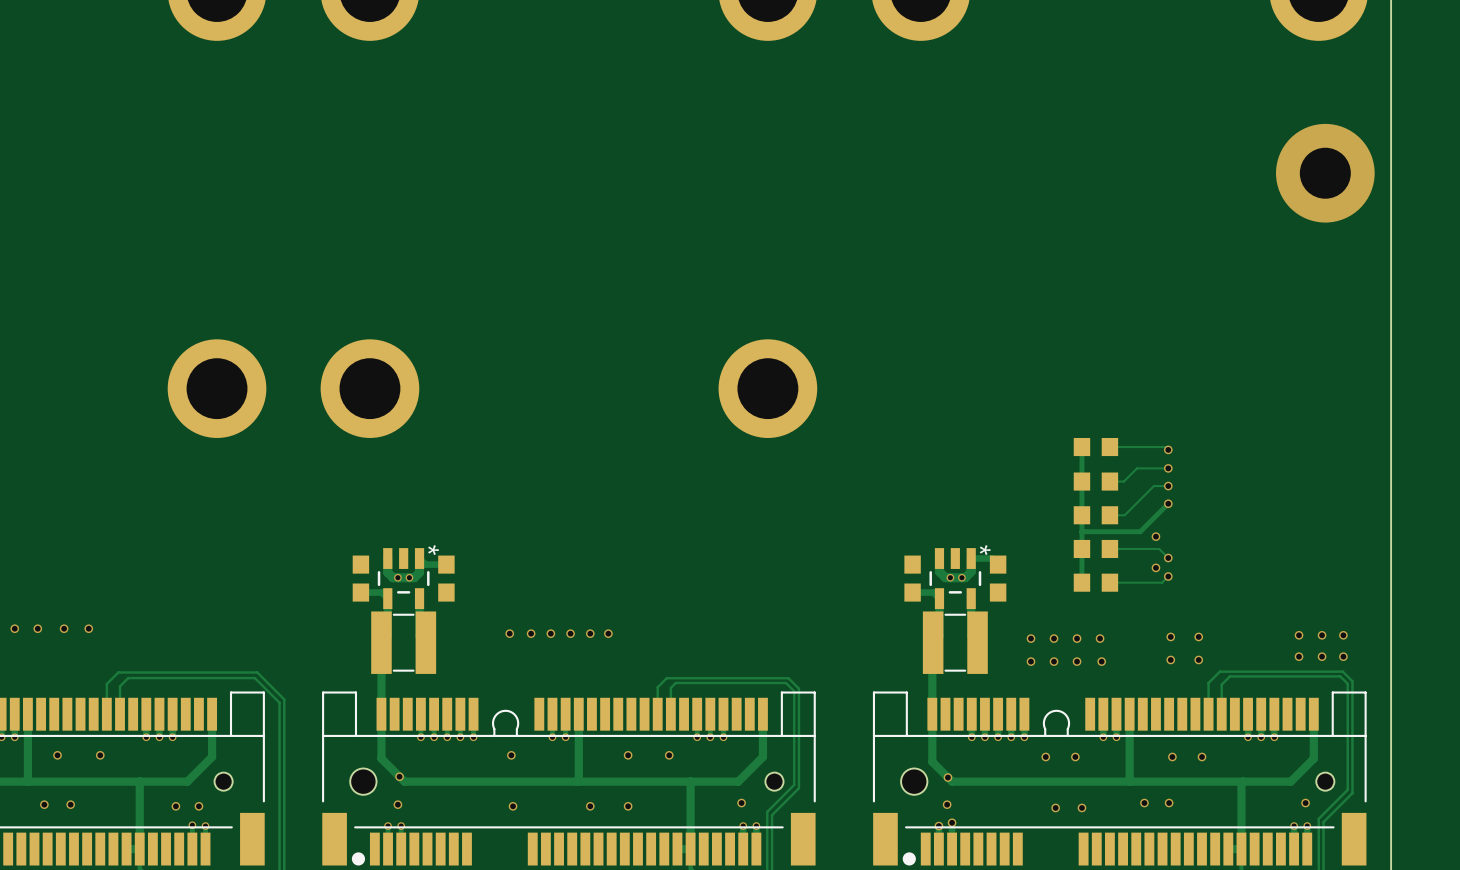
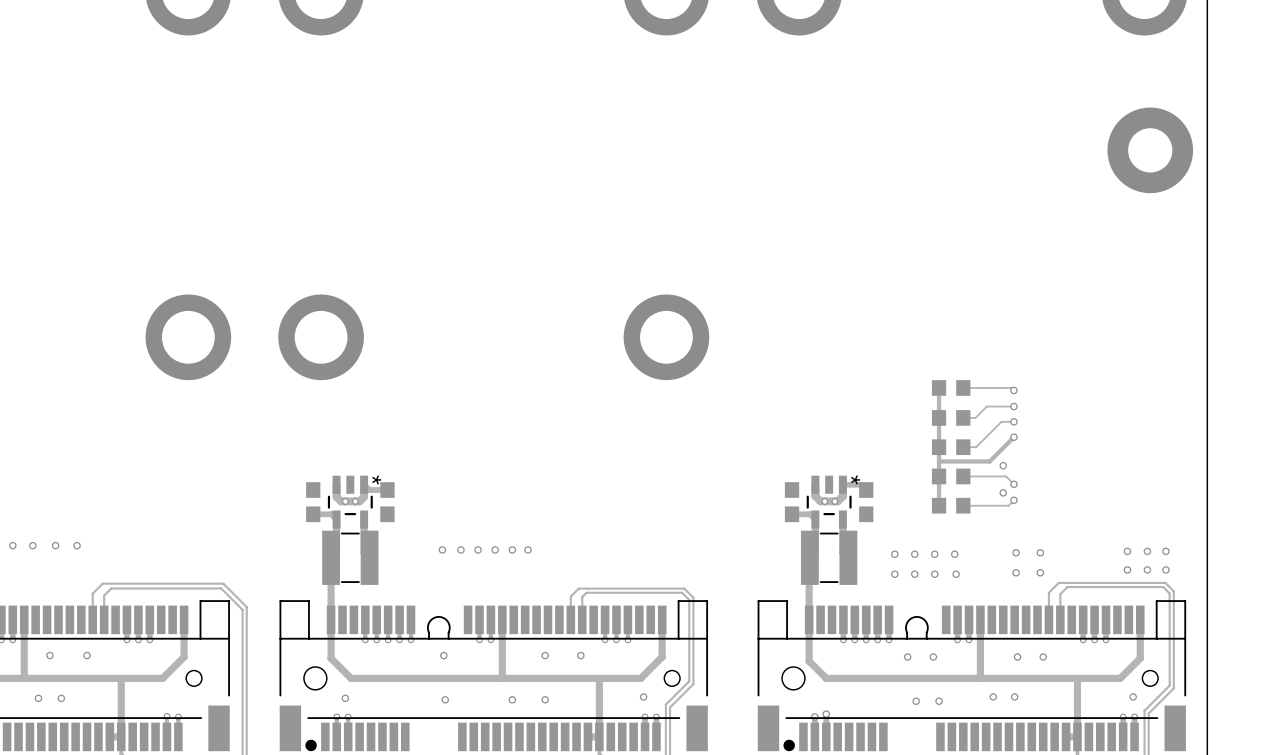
via: (399, 776) -> none
via: (947, 777) -> none
via: (947, 804) -> none
via: (175, 806) -> none
via: (198, 806) -> none

